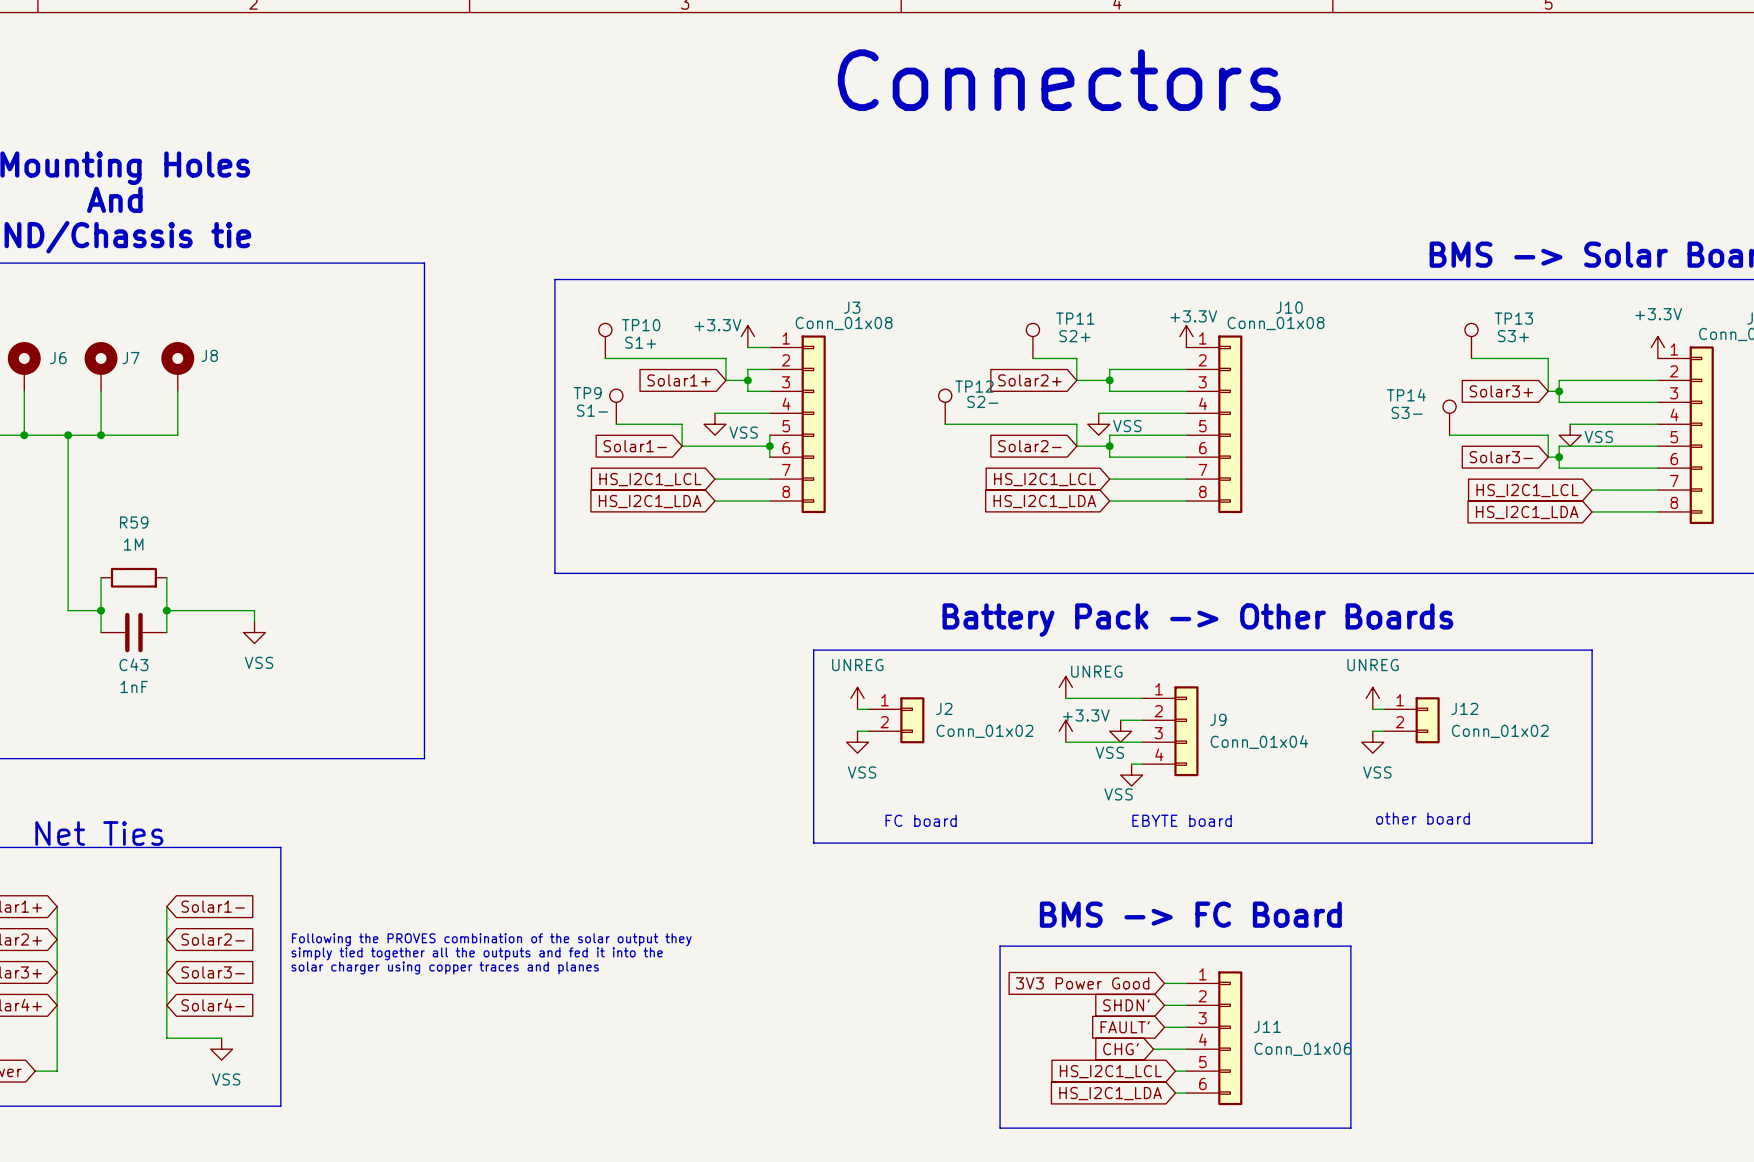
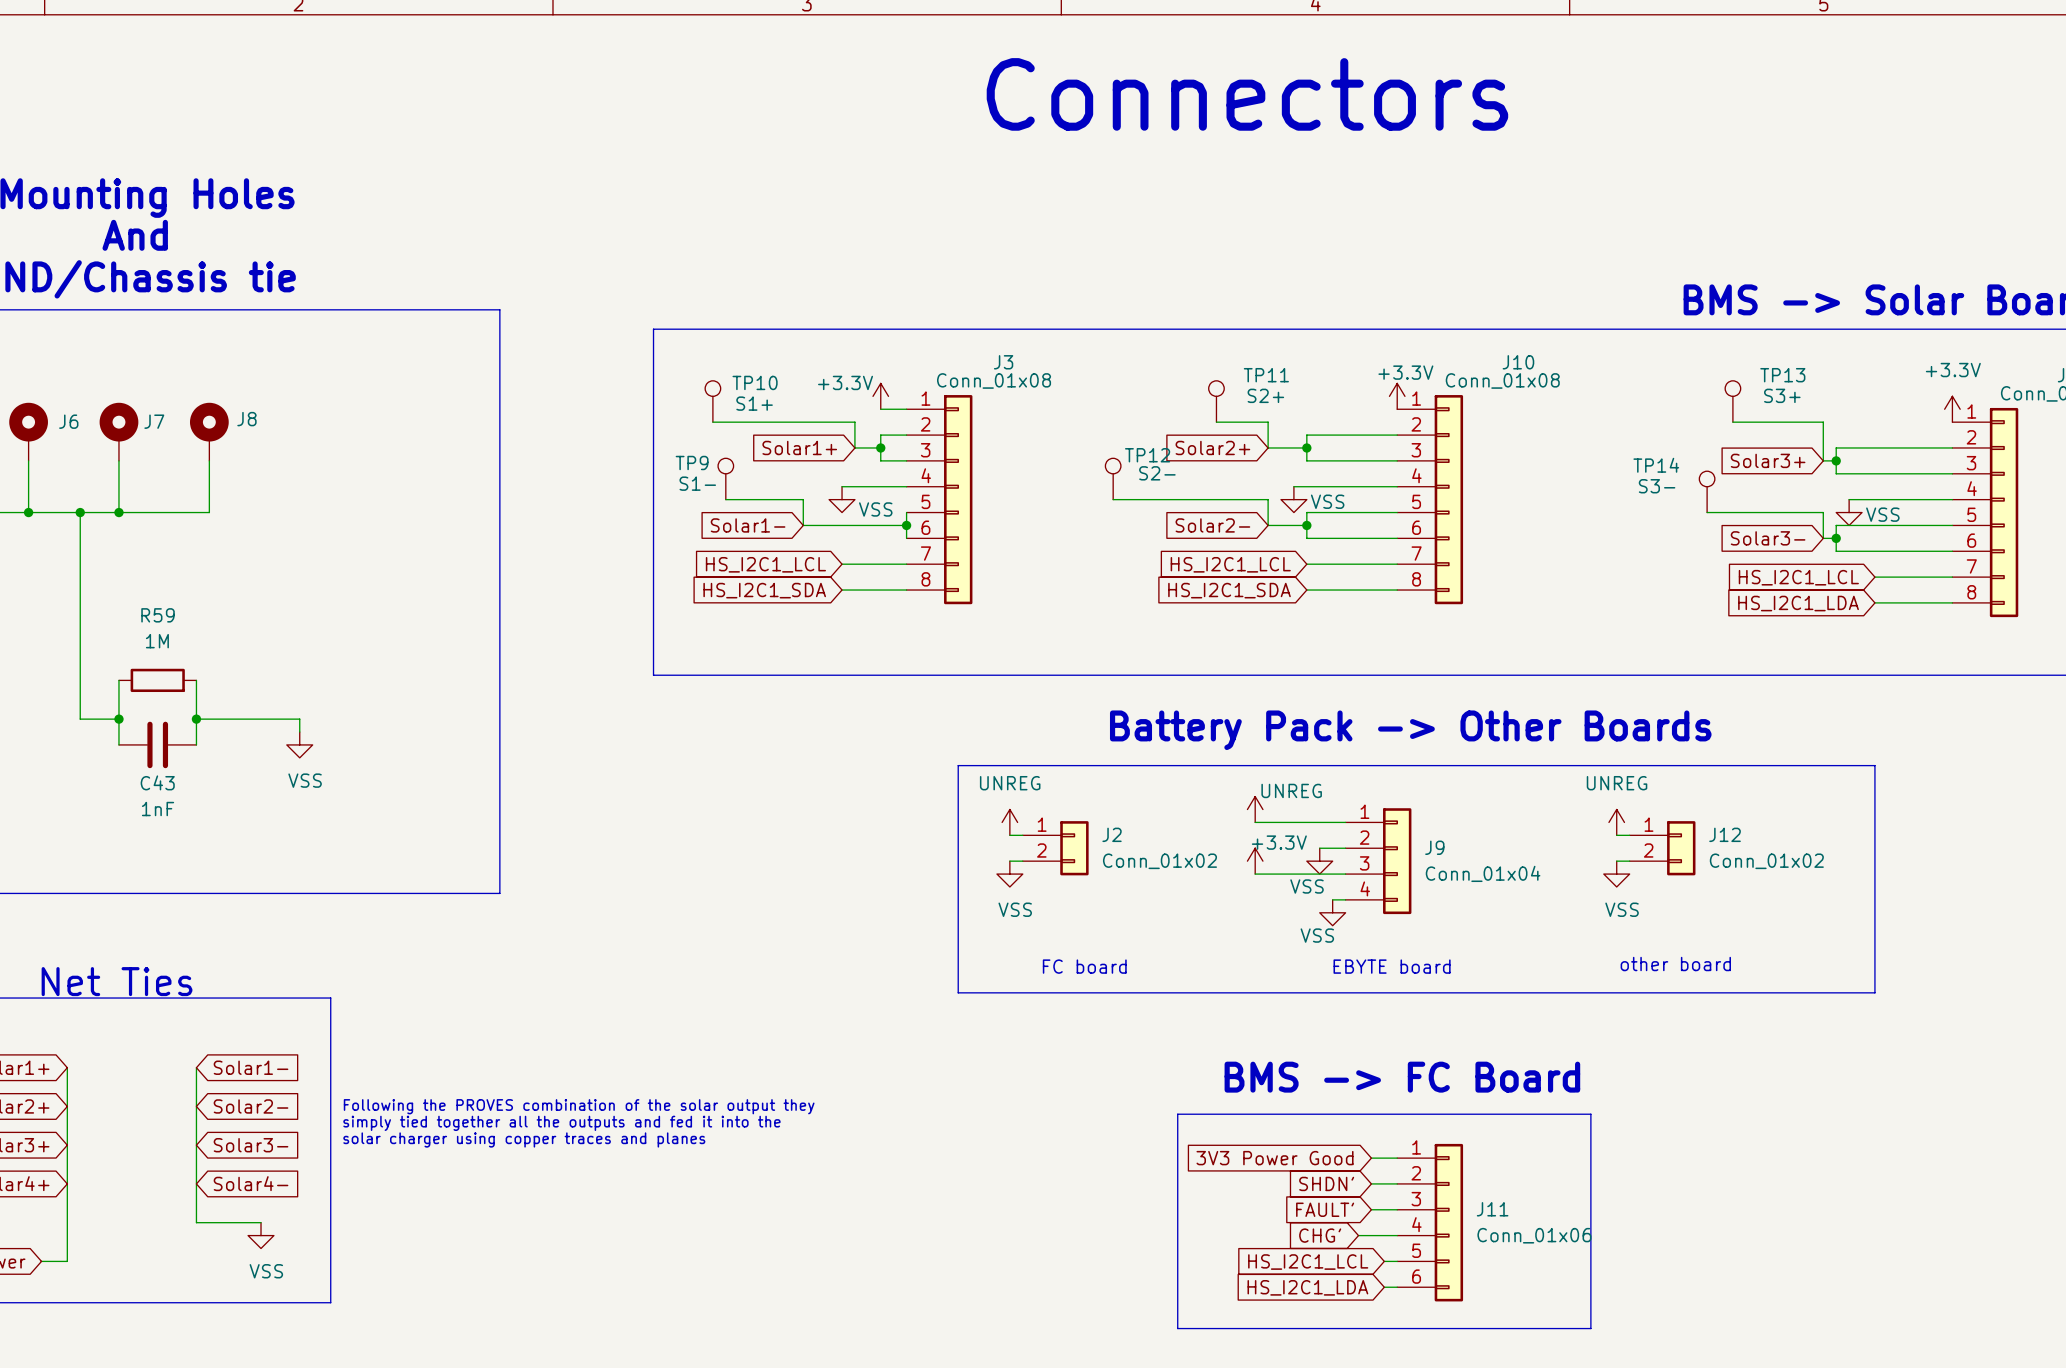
global label: HS_I2C1_LDA (650, 501) -> HS_I2C1_SDA (764, 590)
global label: HS_I2C1_LDA (1044, 501) -> HS_I2C1_SDA (1229, 590)

